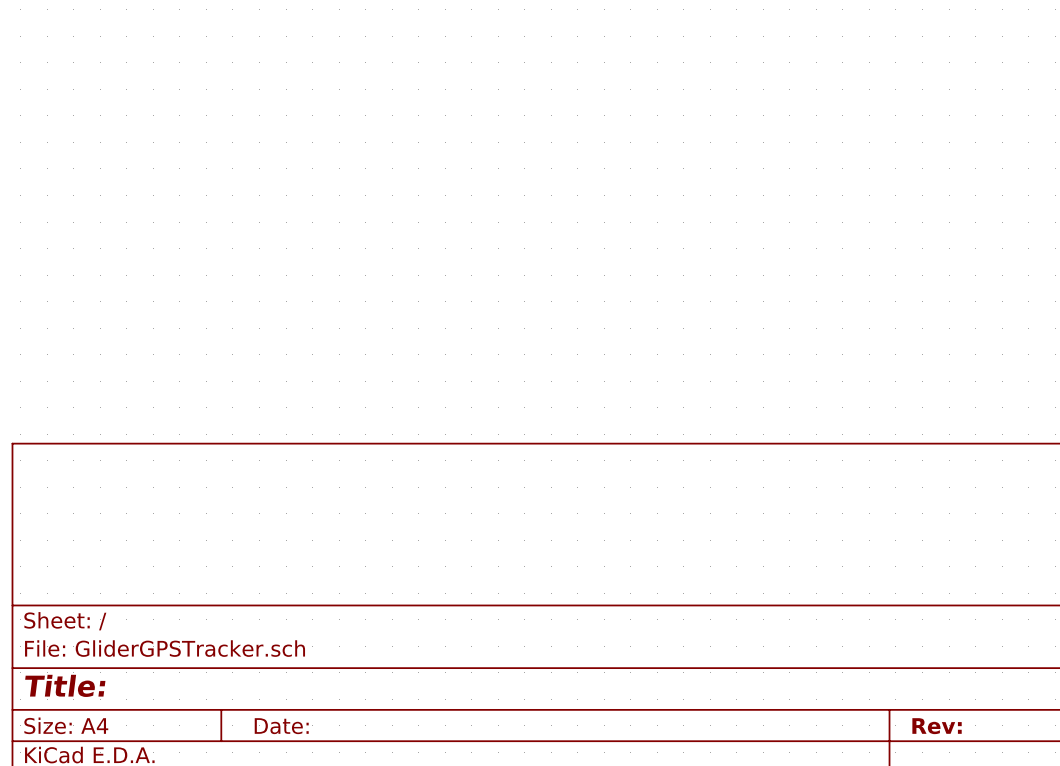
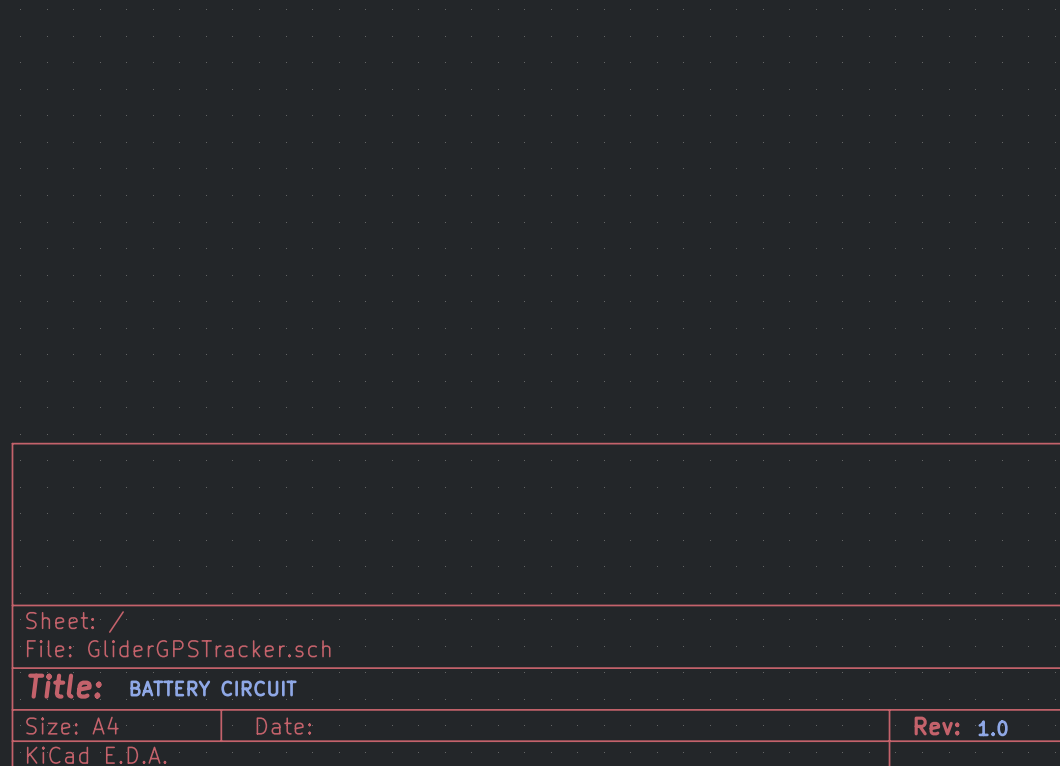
text: none -> BATTERY CIRCUIT (213, 688)
text: none -> 1.0 (993, 728)

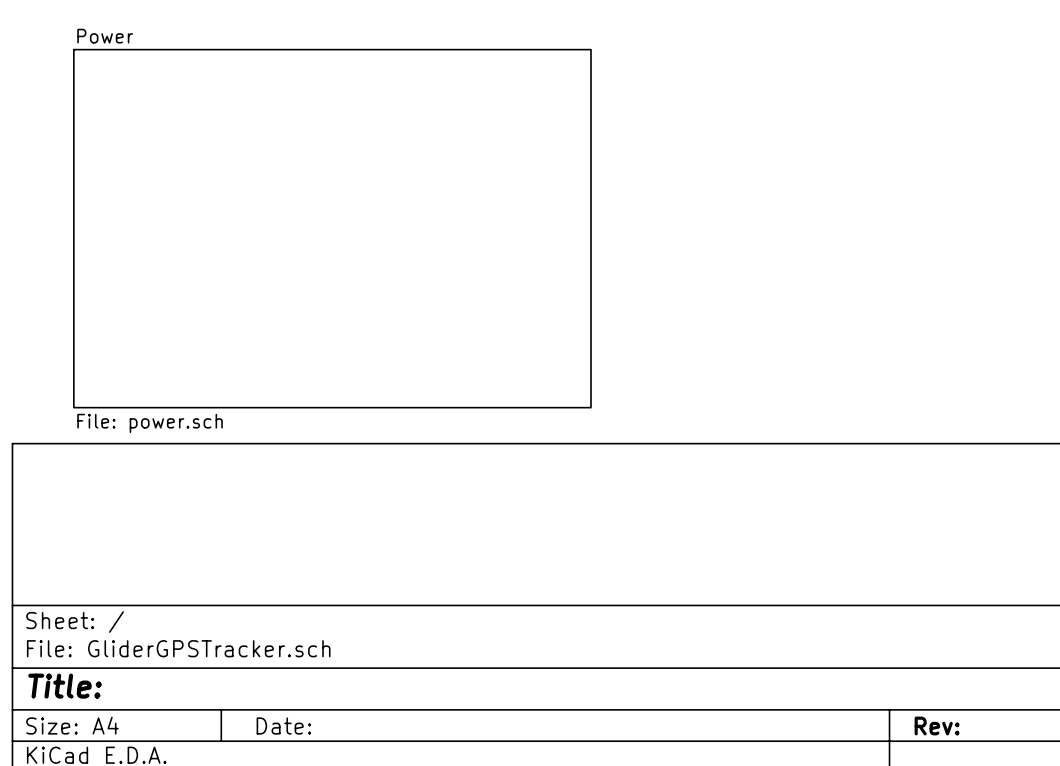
sheet Power: none -> File: power.sch (332, 228)
text: BATTERY CIRCUIT (213, 688) -> none
text: 1.0 (993, 728) -> none

